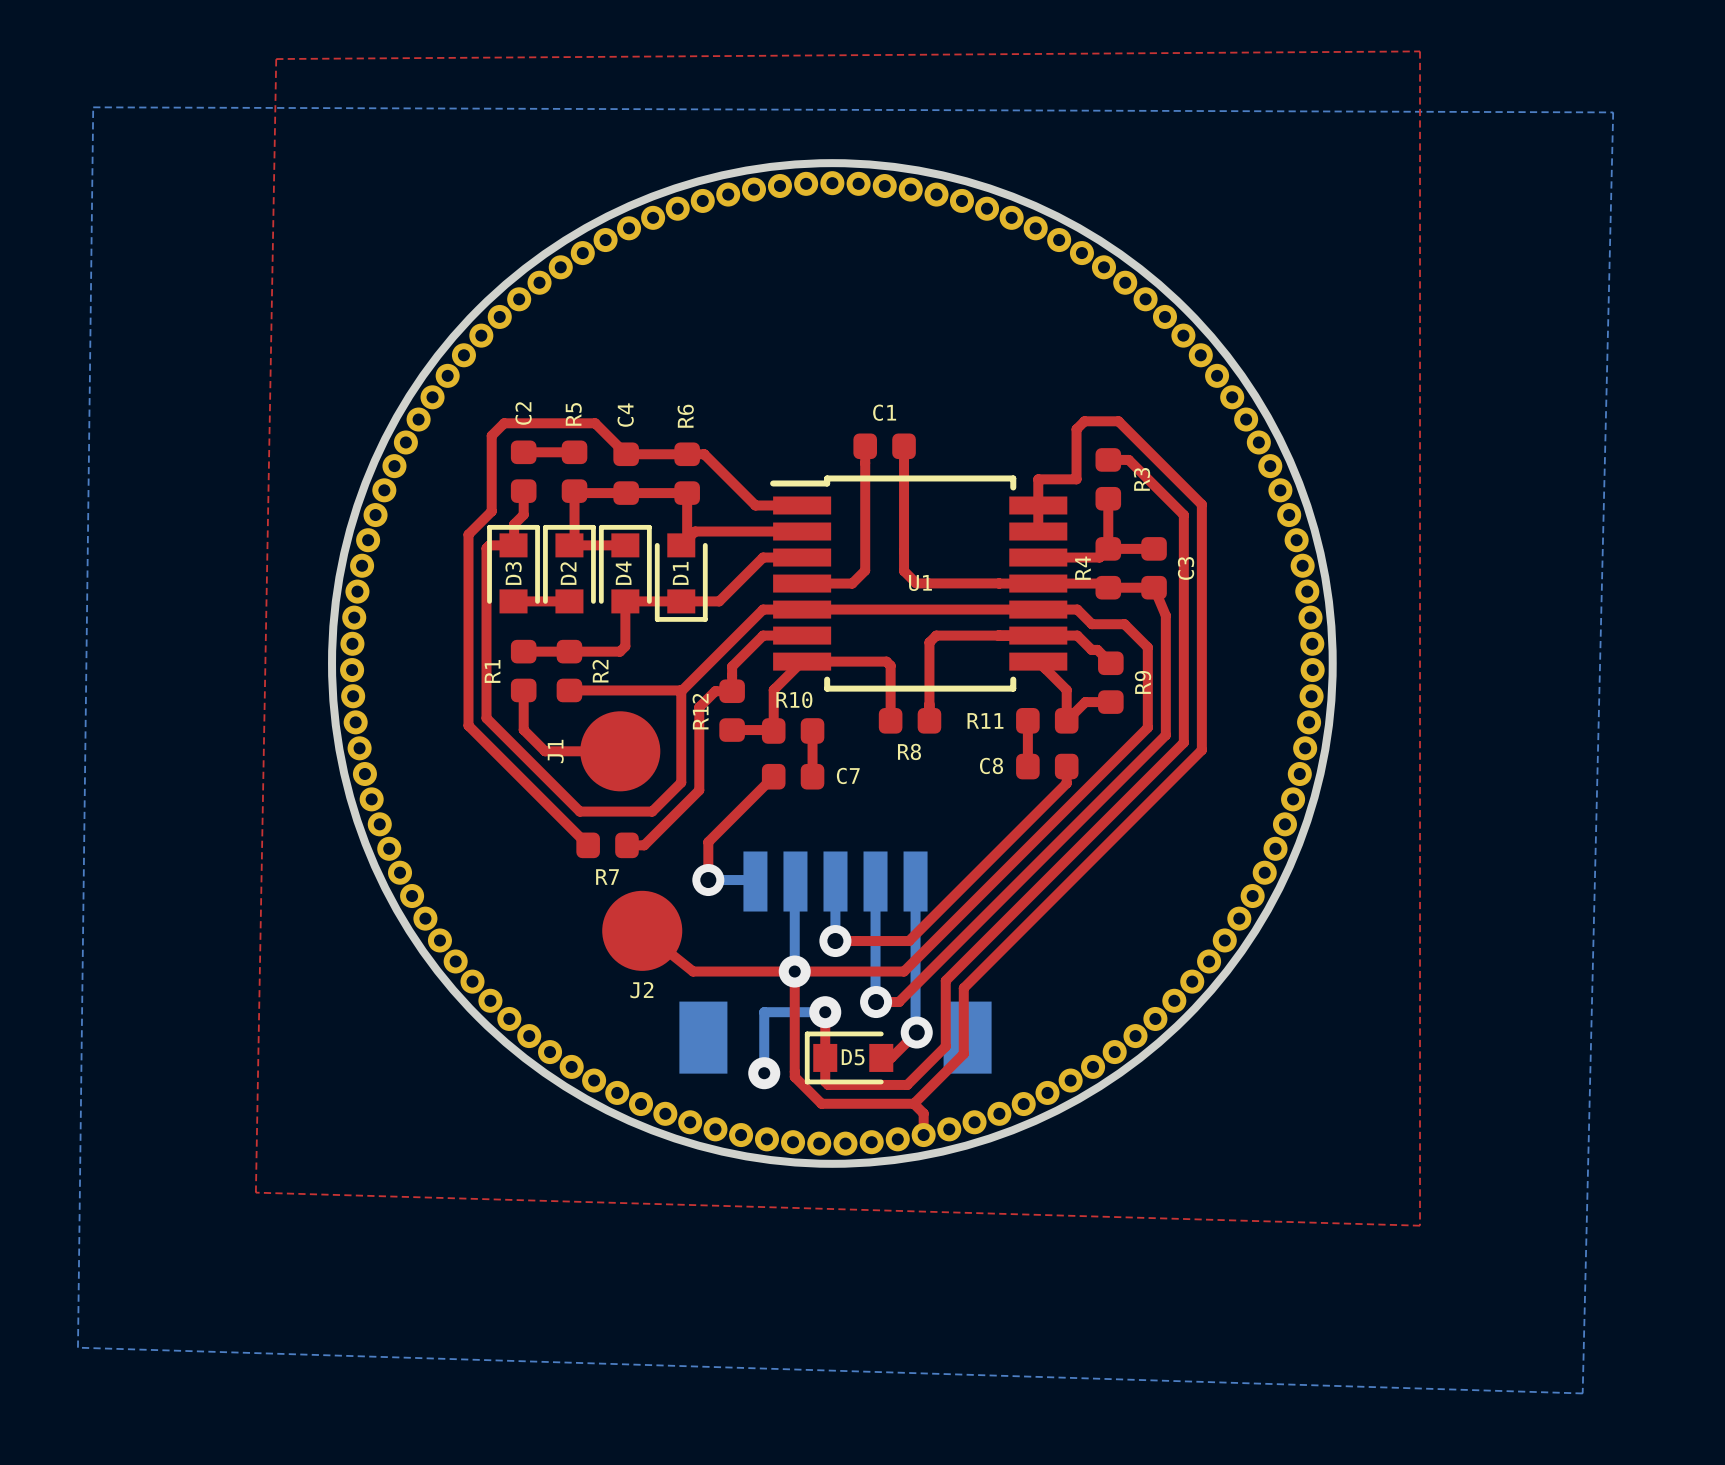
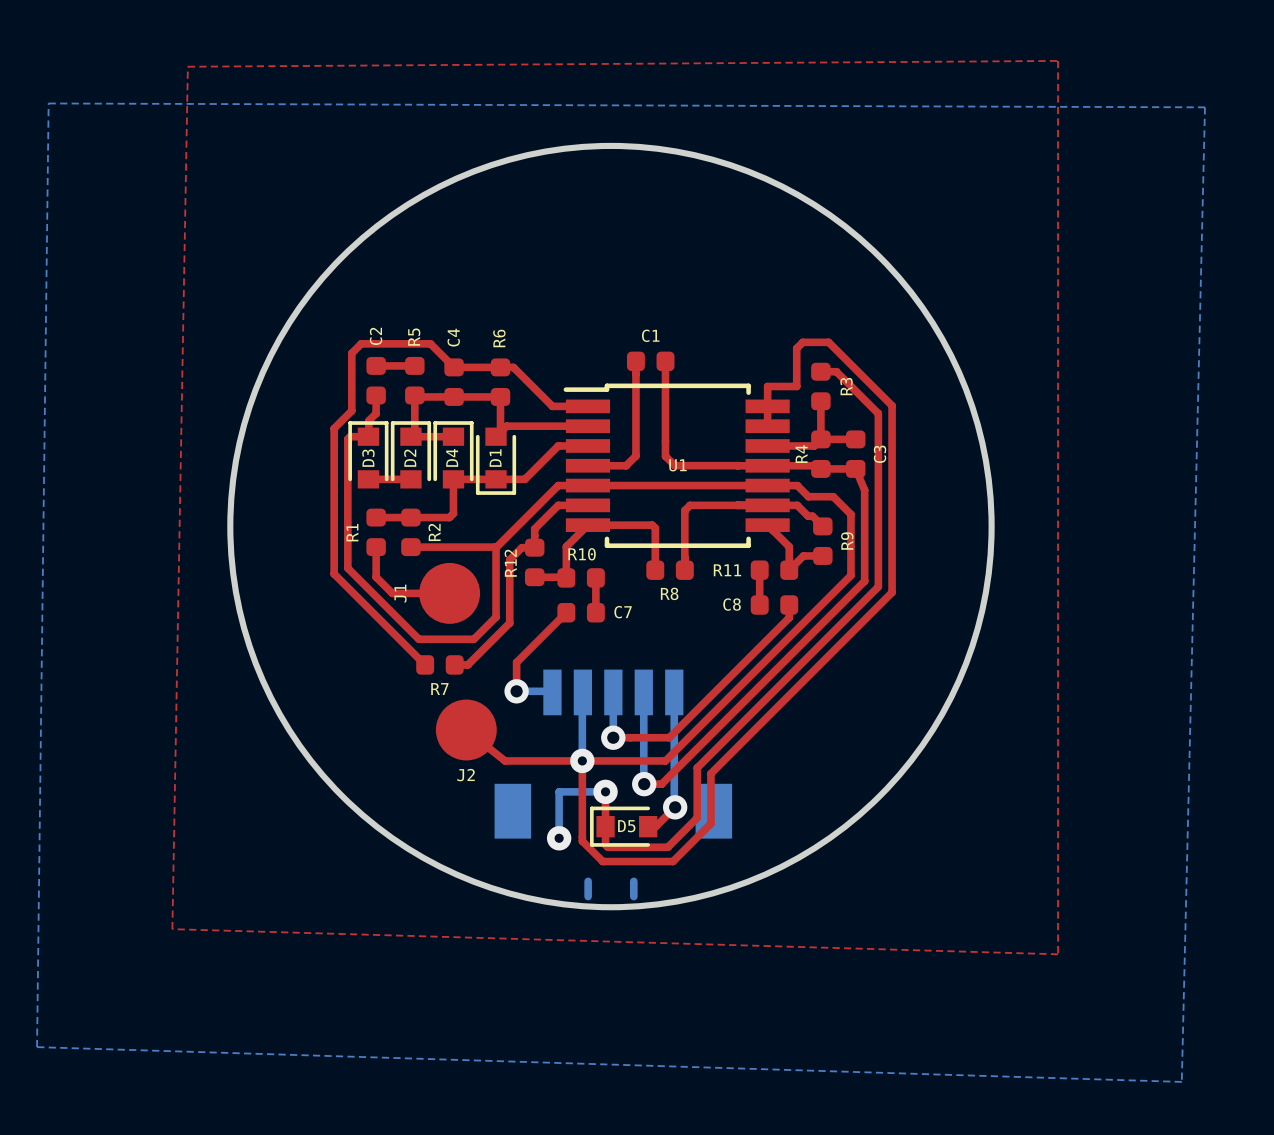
part: (832, 663) -> none
top track: (913, 1103) (923, 1113) (923, 1135) -> none
bottom track: none -> (588, 881) (588, 896)
bottom track: none -> (633, 881) (633, 896)

